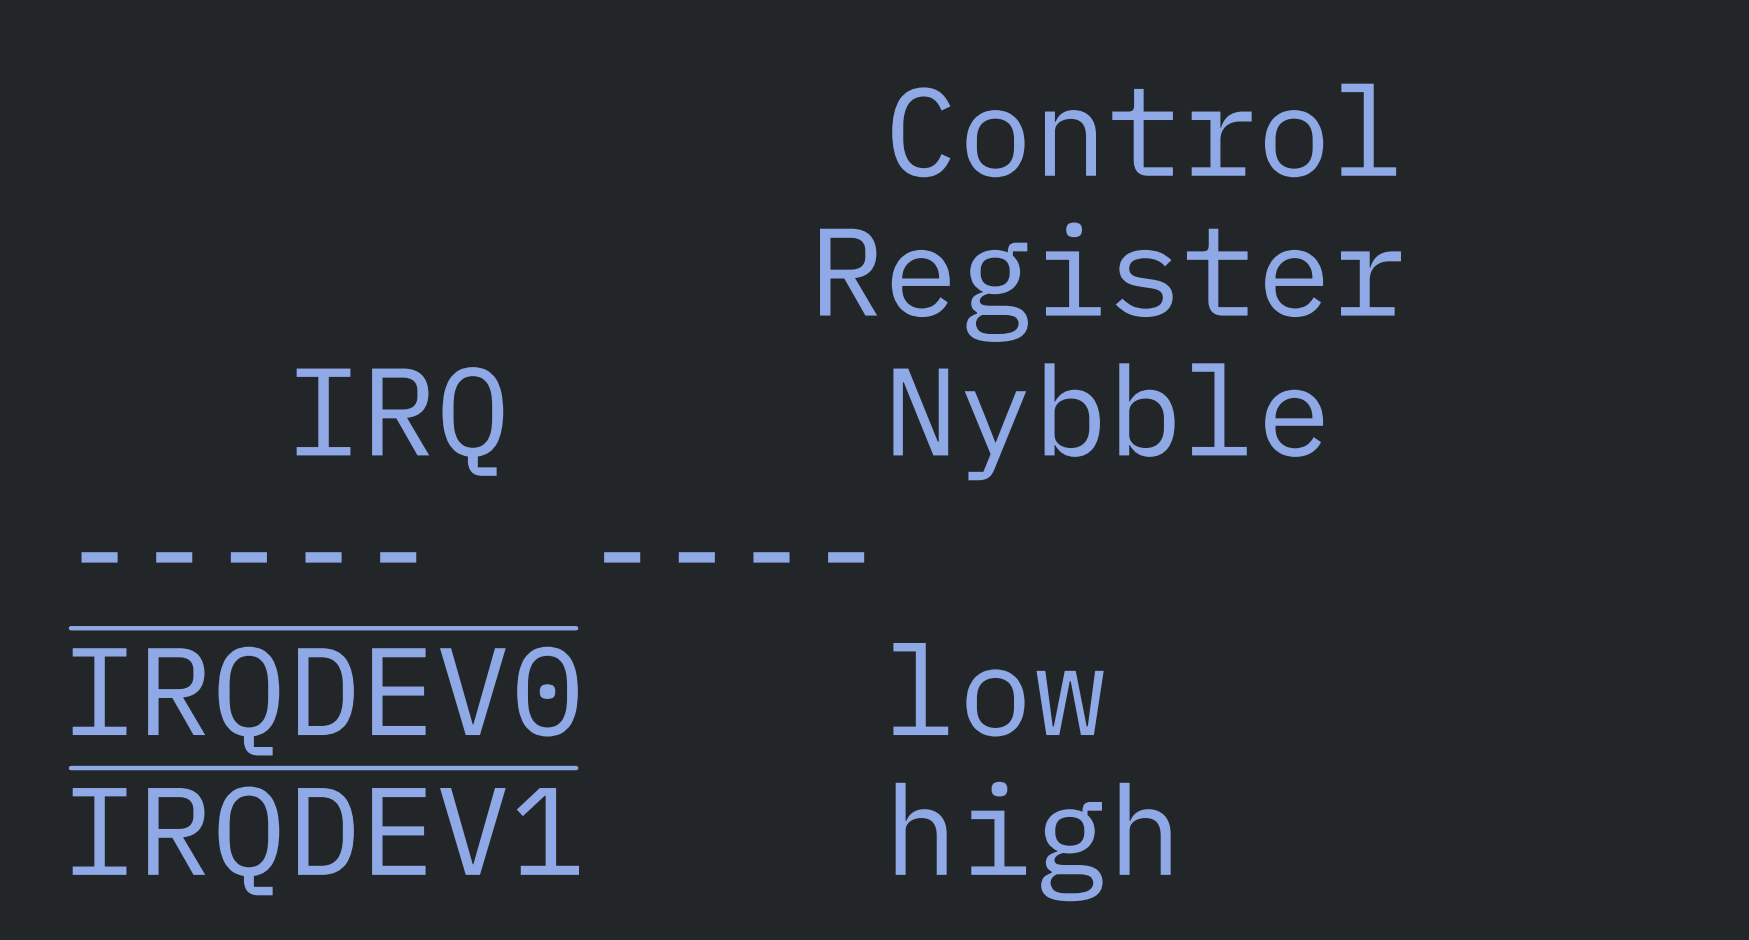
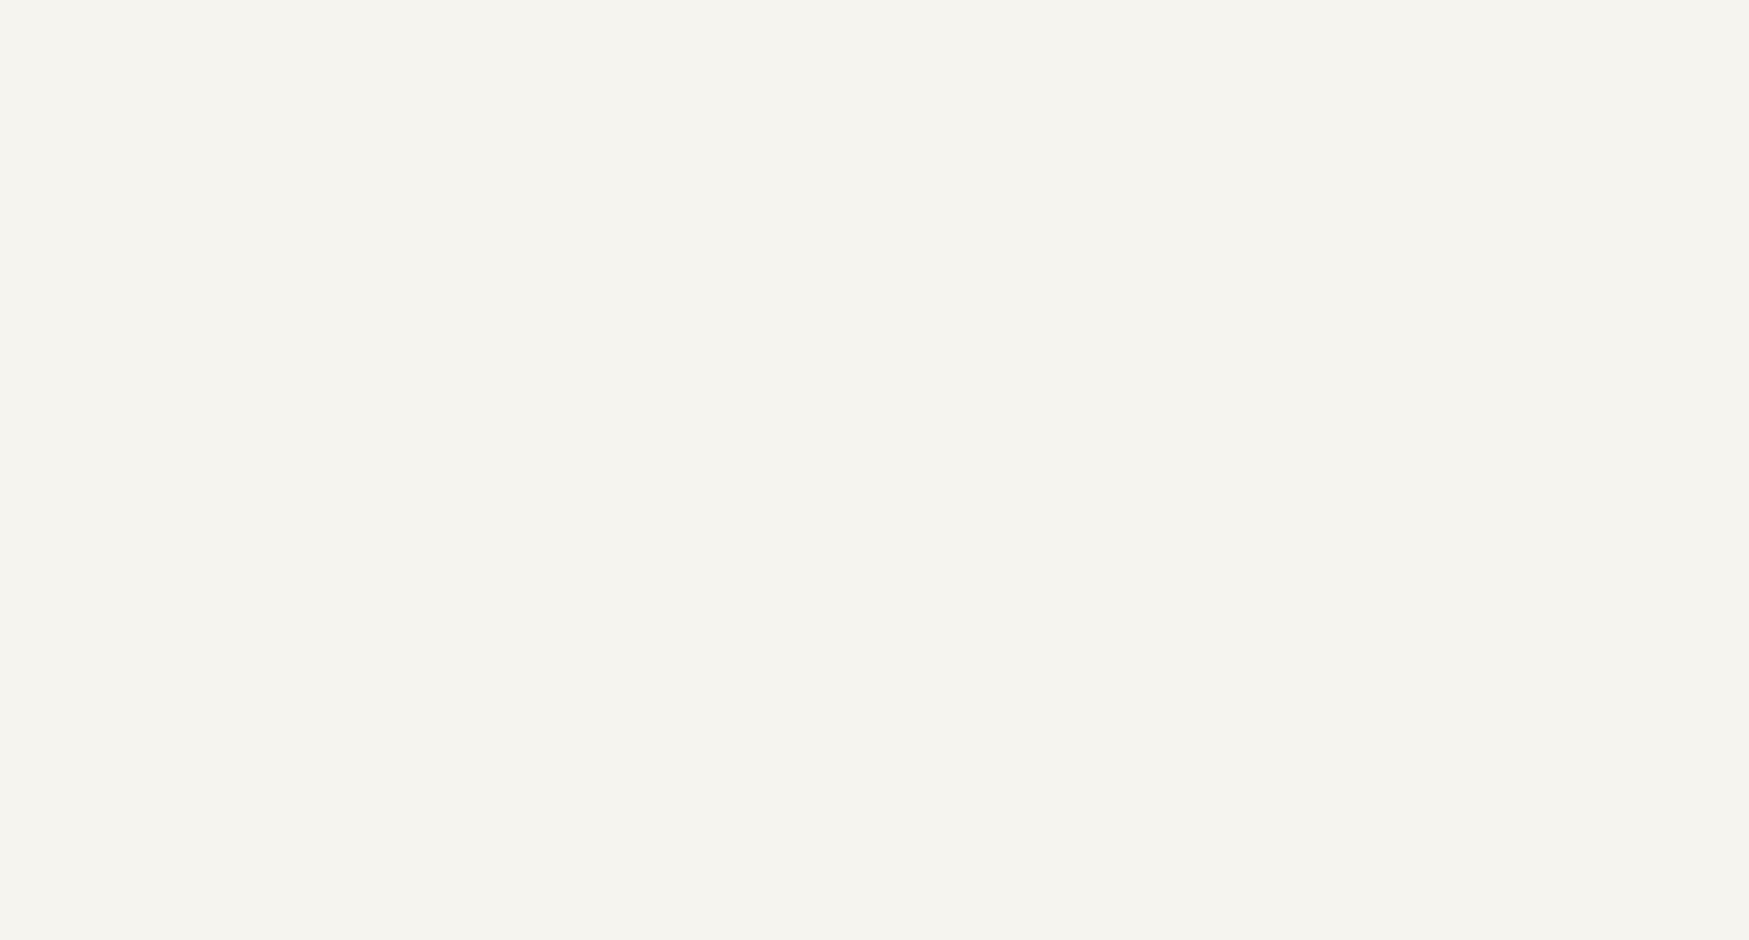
text: Control (1144, 130) -> none
text: Register (1110, 282) -> none
text: IRQ Nybble (809, 421) -> none
text: ----- ---- (472, 557) -> none
text: ~{IRQDEV0} low (587, 691) -> none
text: ~{IRQDEV1} high (620, 834) -> none

